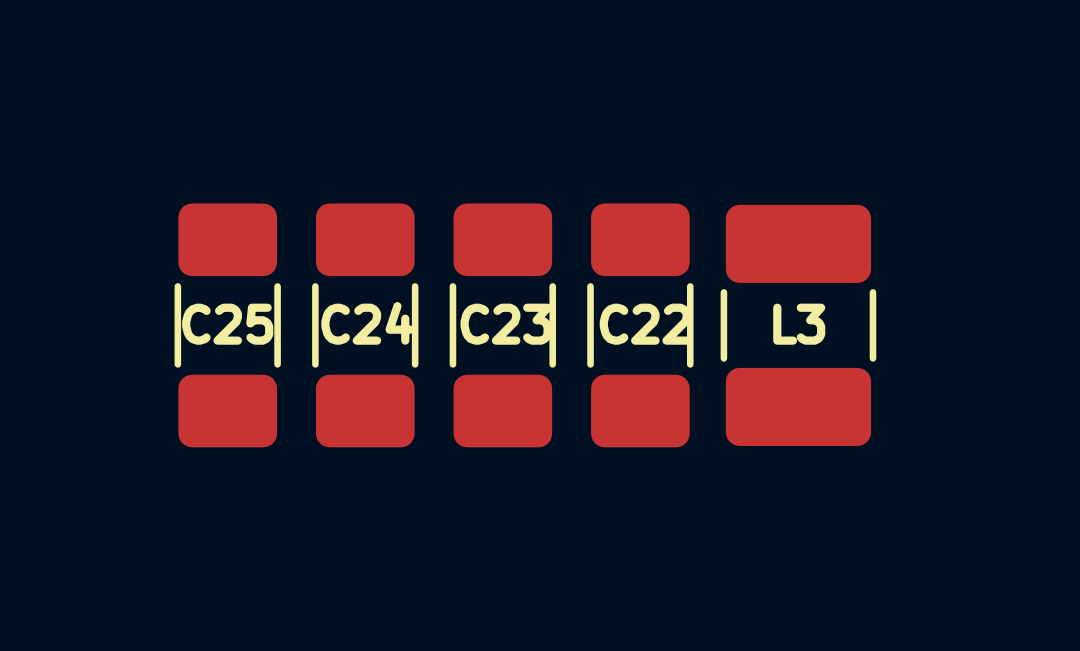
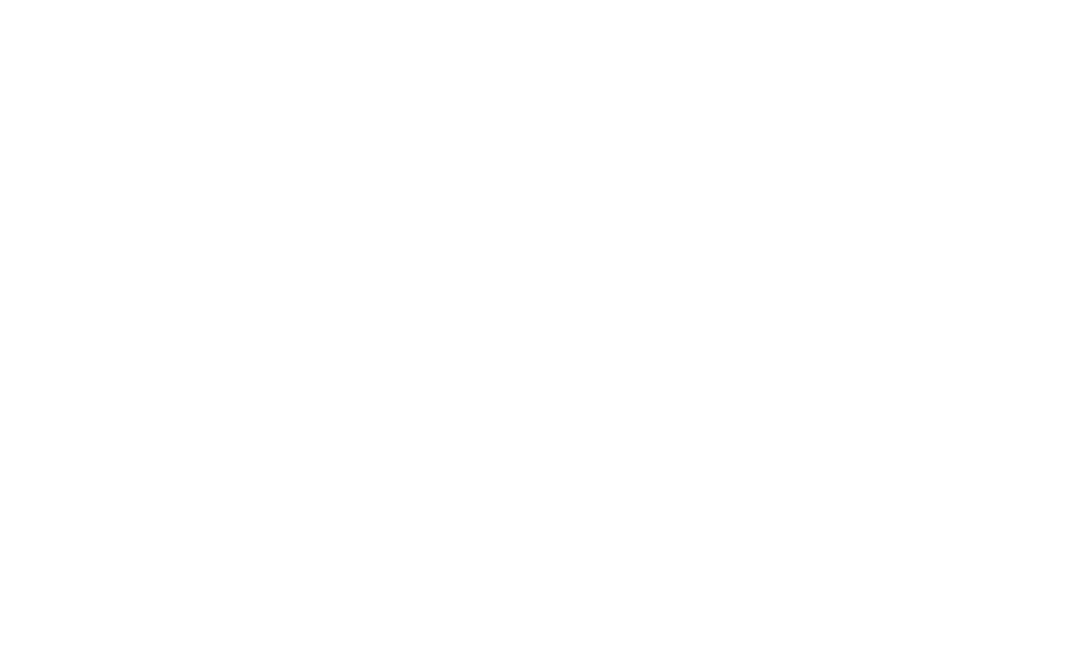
C25: (227, 325) -> none
C24: (365, 325) -> none
C23: (502, 325) -> none
C22: (640, 325) -> none
L3: (798, 325) -> none

